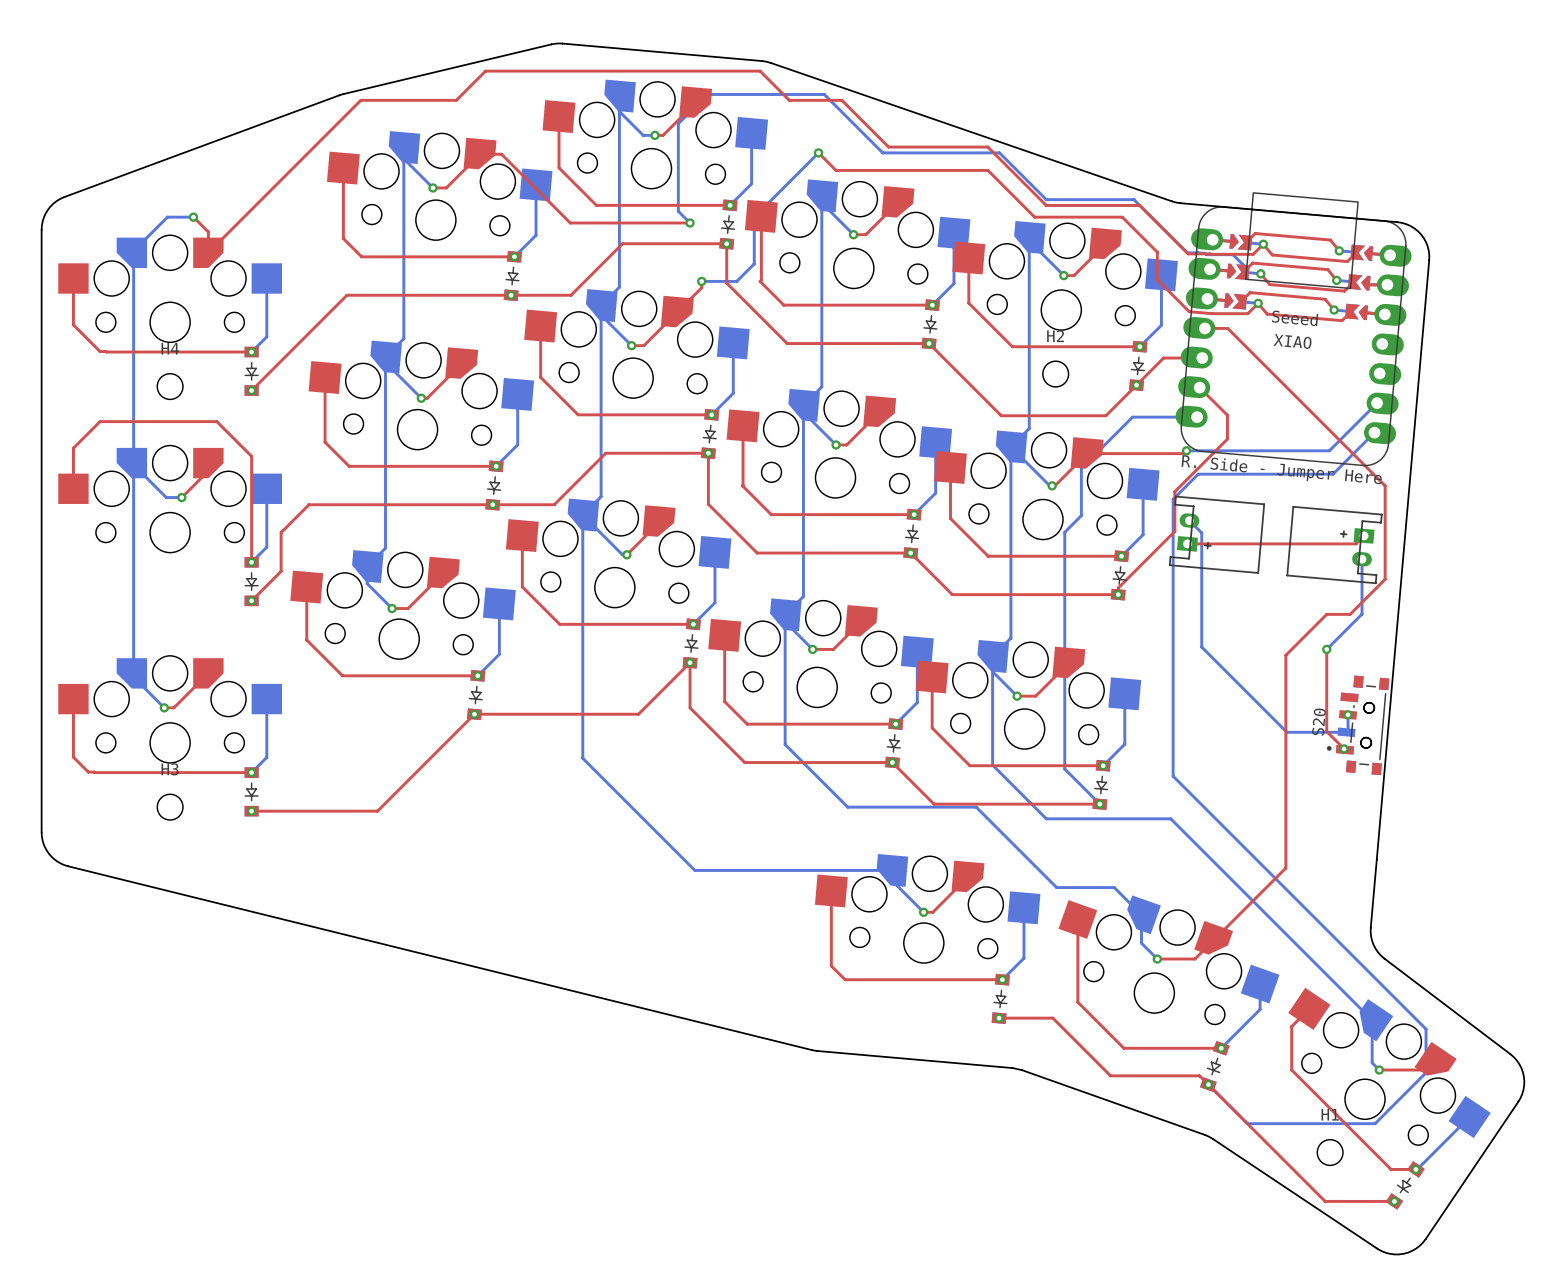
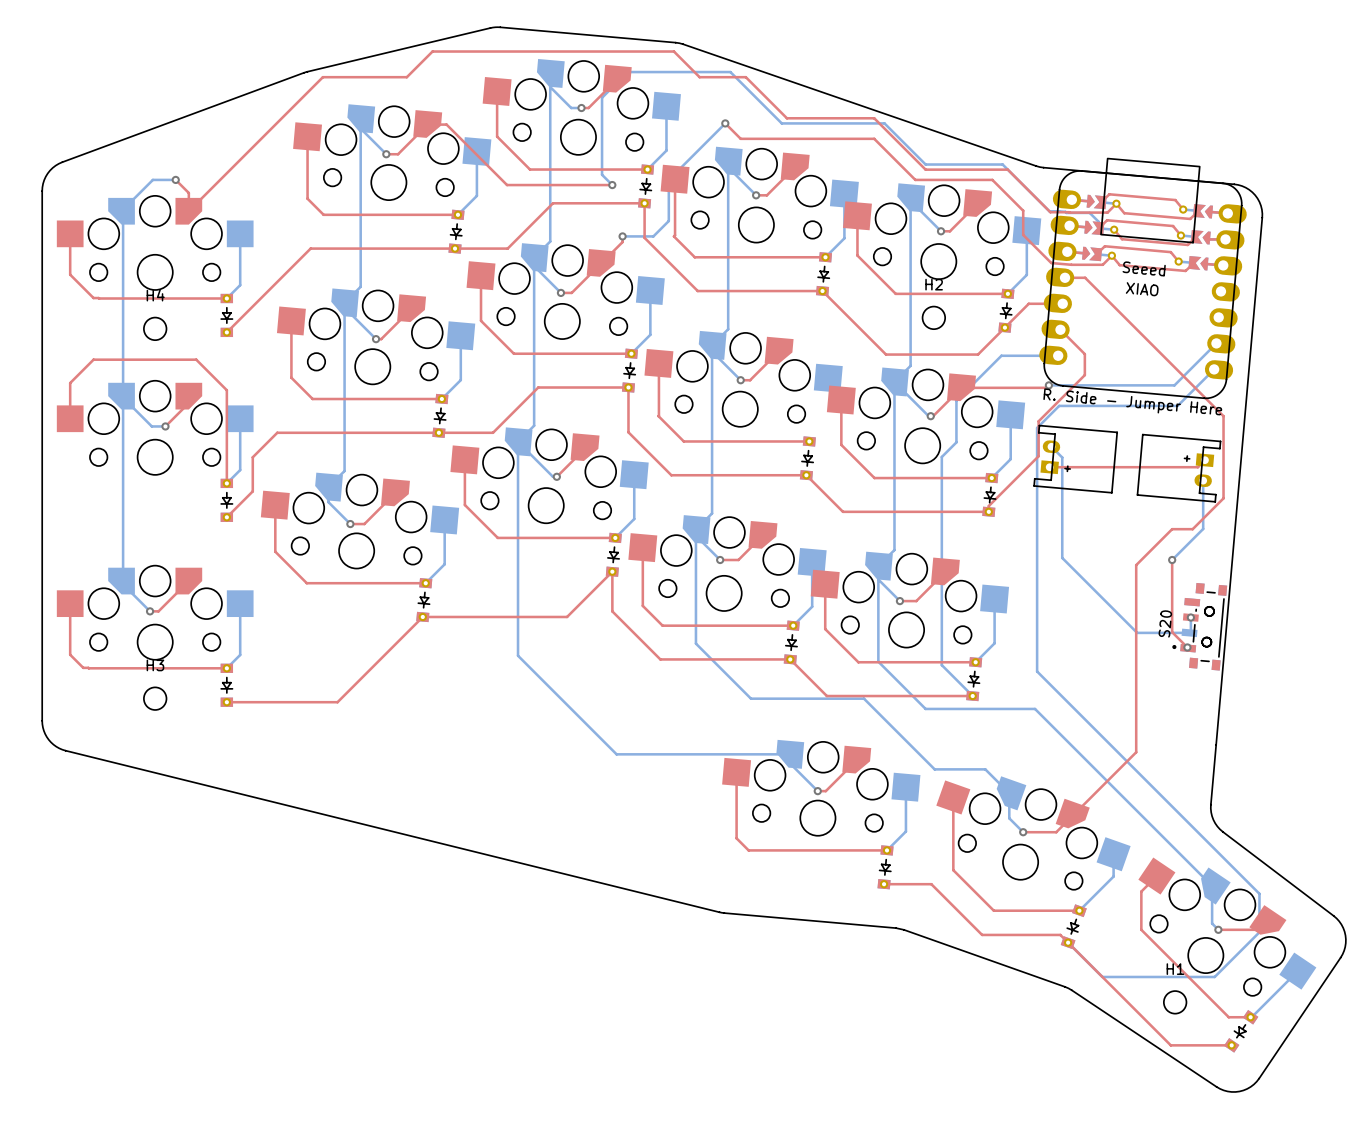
bottom track: (935, 442) (935, 493) (914, 514) -> none

